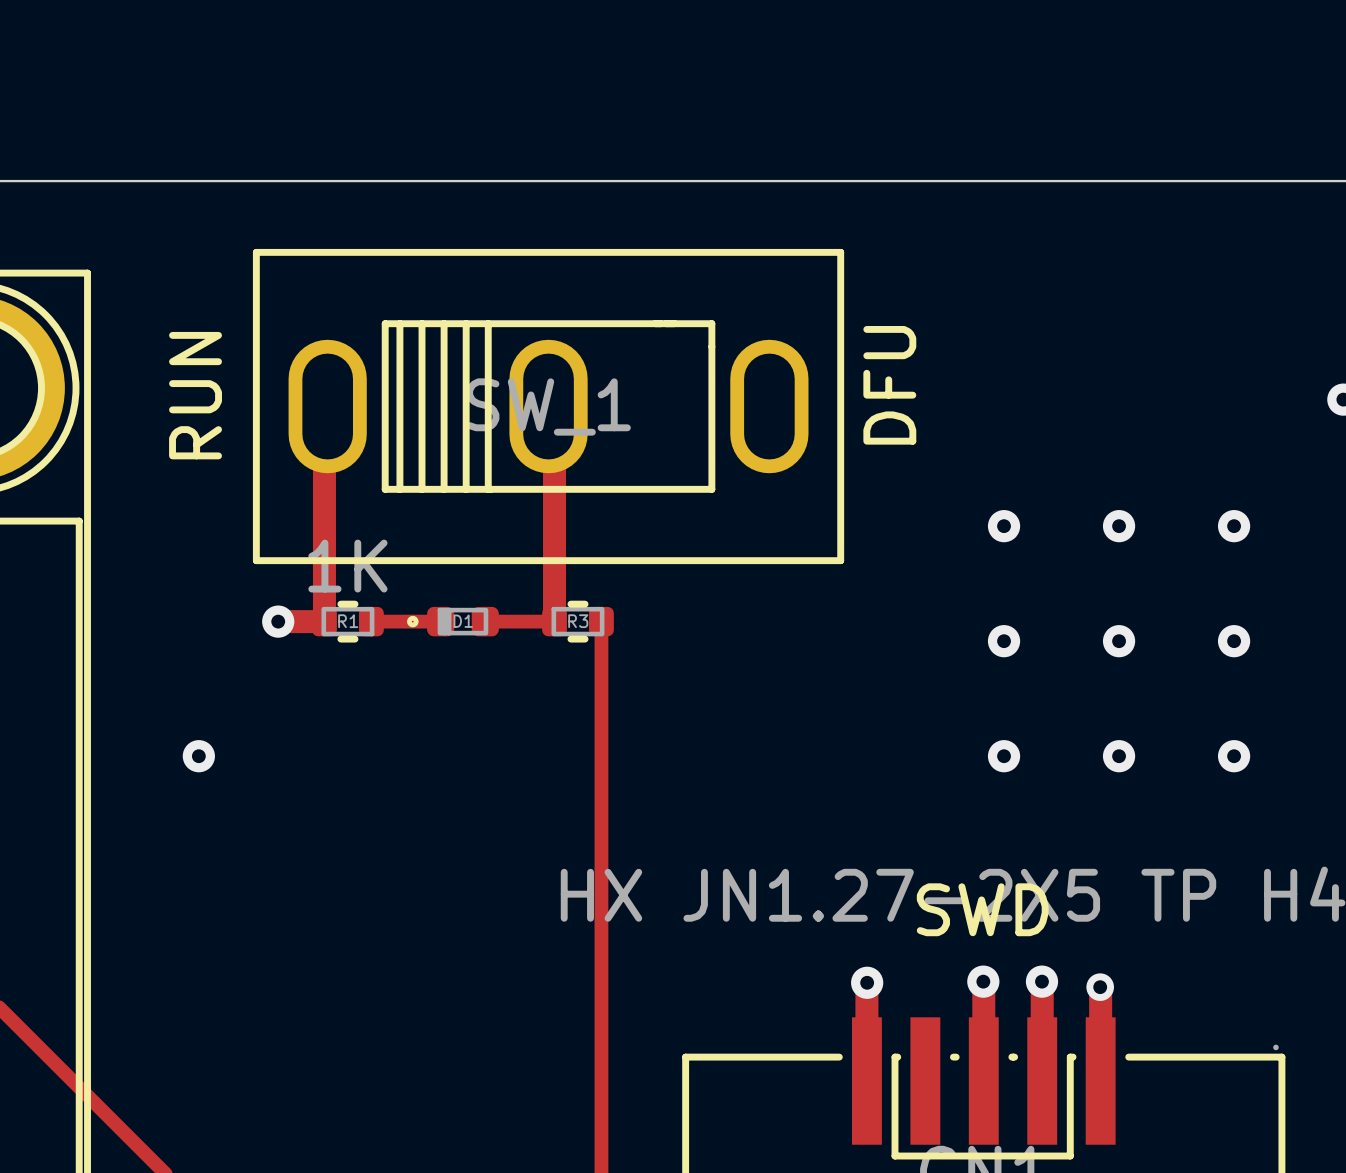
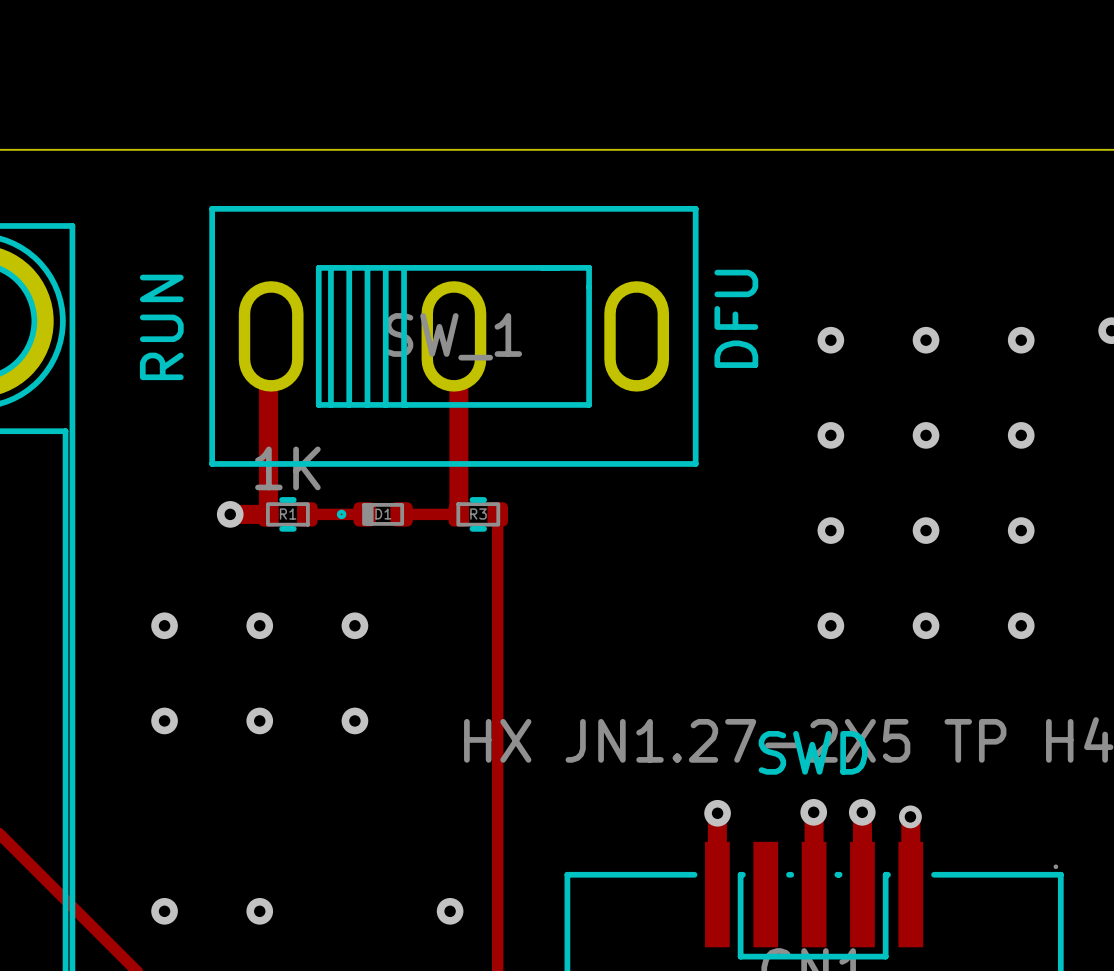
via: none -> (830, 340)
via: none -> (926, 340)
via: none -> (1021, 340)
via: none -> (259, 625)
via: none -> (354, 625)
via: none -> (164, 720)
via: none -> (259, 720)
via: none -> (354, 720)
via: none -> (164, 911)
via: none -> (259, 911)
via: none -> (450, 911)

